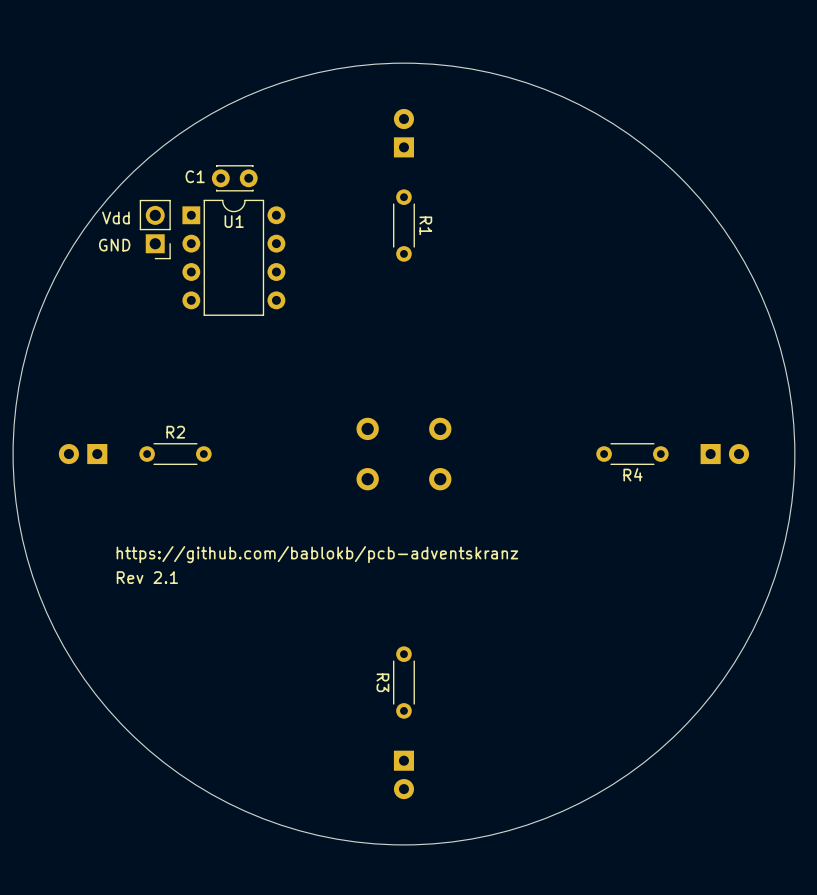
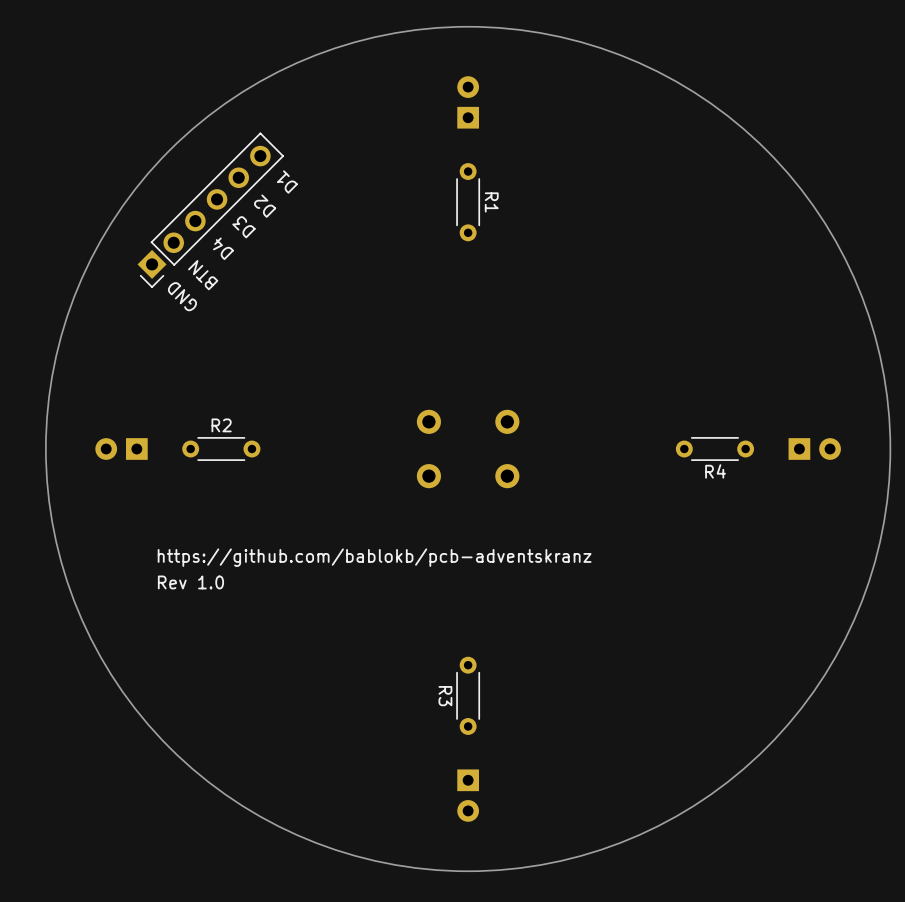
C1: (234, 178) -> none
part footprint: [139, 199, 171, 260] -> [137, 132, 284, 288]
text: none -> D1 (287, 182)
text: Vdd (115, 217) -> none
text: none -> D2 (265, 206)
text rotation: 0° (114, 245) -> 135° counterclockwise (182, 296)
text position: GND (114, 245) -> GND (182, 296)
text: none -> D3 (243, 227)
U1: (233, 257) -> none
text: none -> D4 (223, 248)
text: none -> BTN (203, 275)
text: Rev 2.1 (147, 577) -> Rev 1.0 (190, 582)

